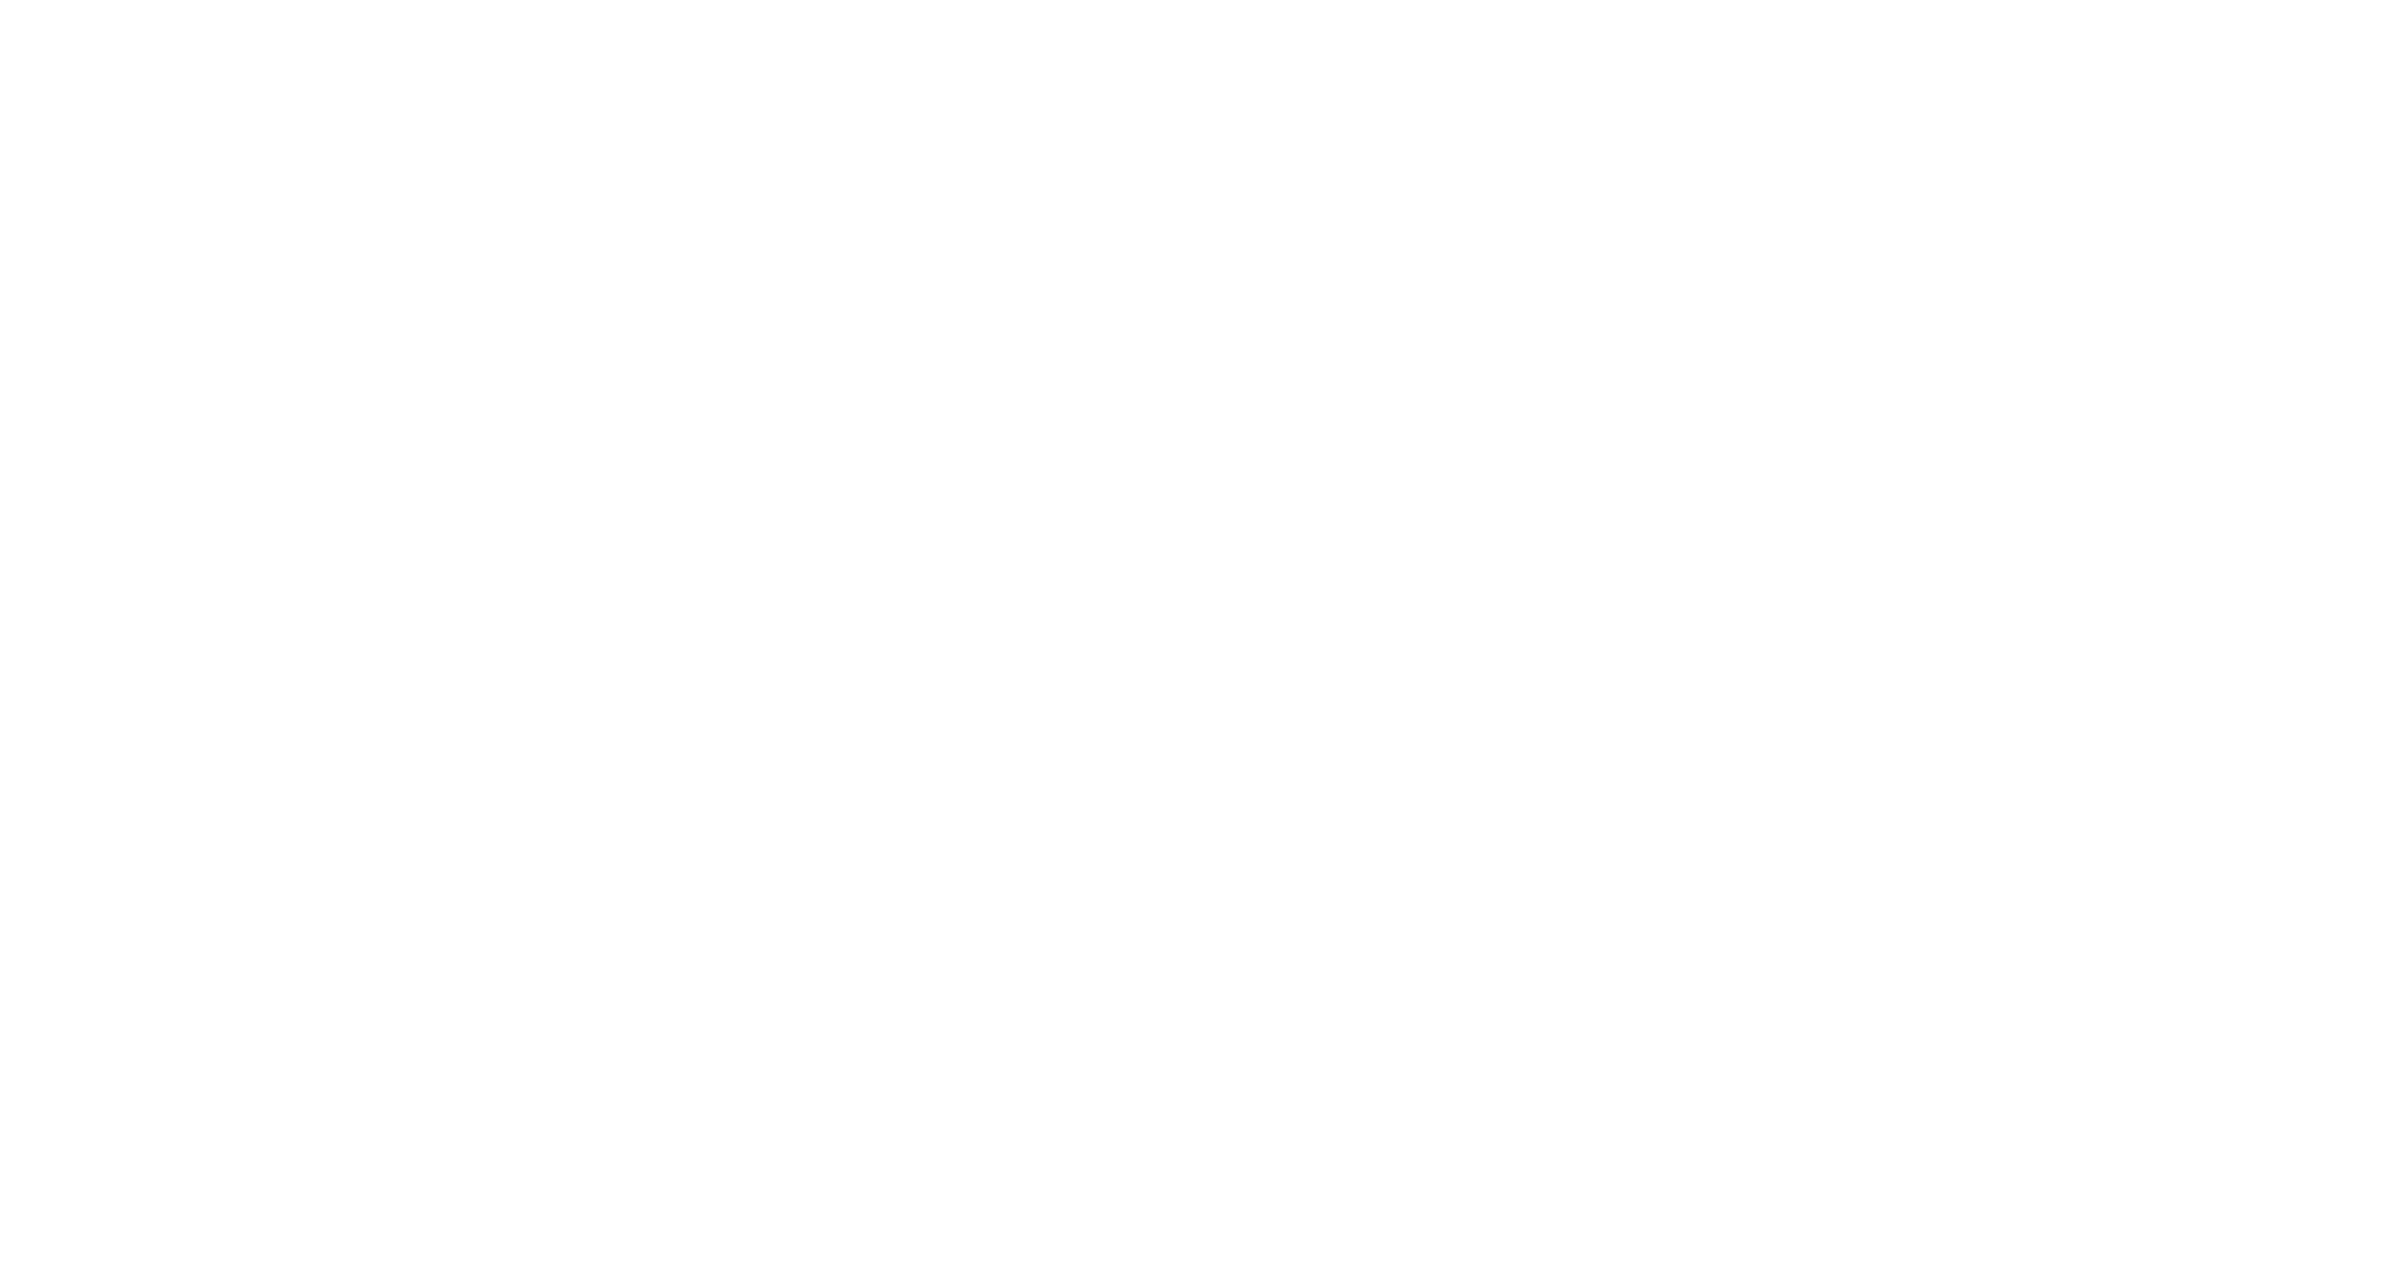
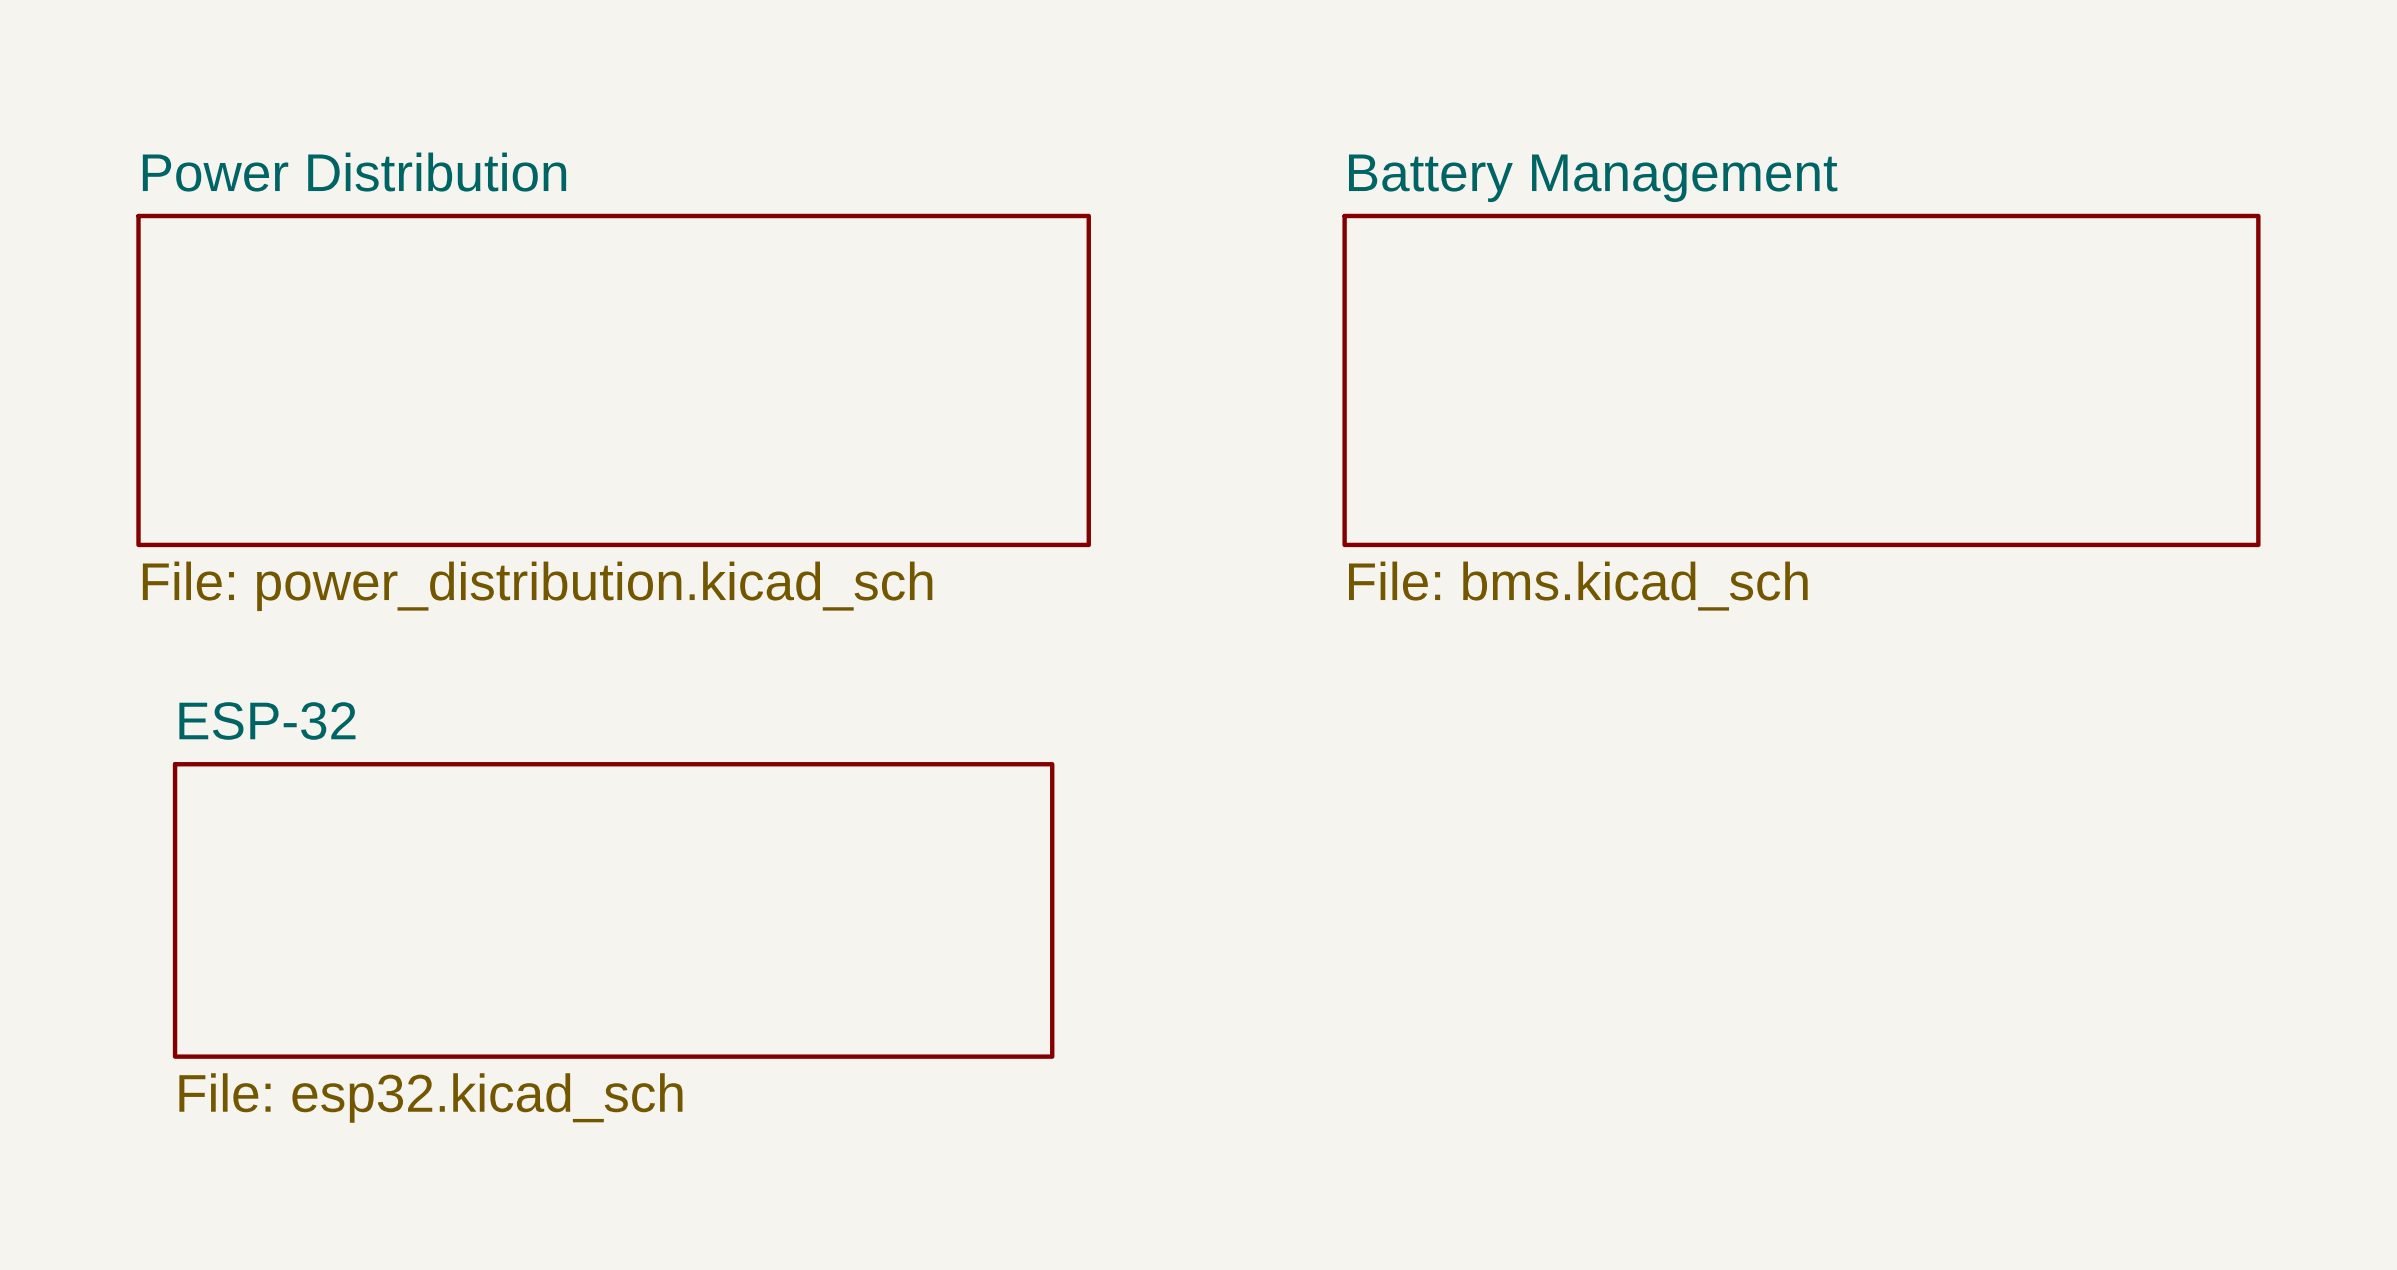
sheet Power Distribution: none -> File: power_distribution.kicad_sch (613, 380)
sheet Battery Management: none -> File: bms.kicad_sch (1801, 380)
sheet ESP-32: none -> File: esp32.kicad_sch (613, 910)

